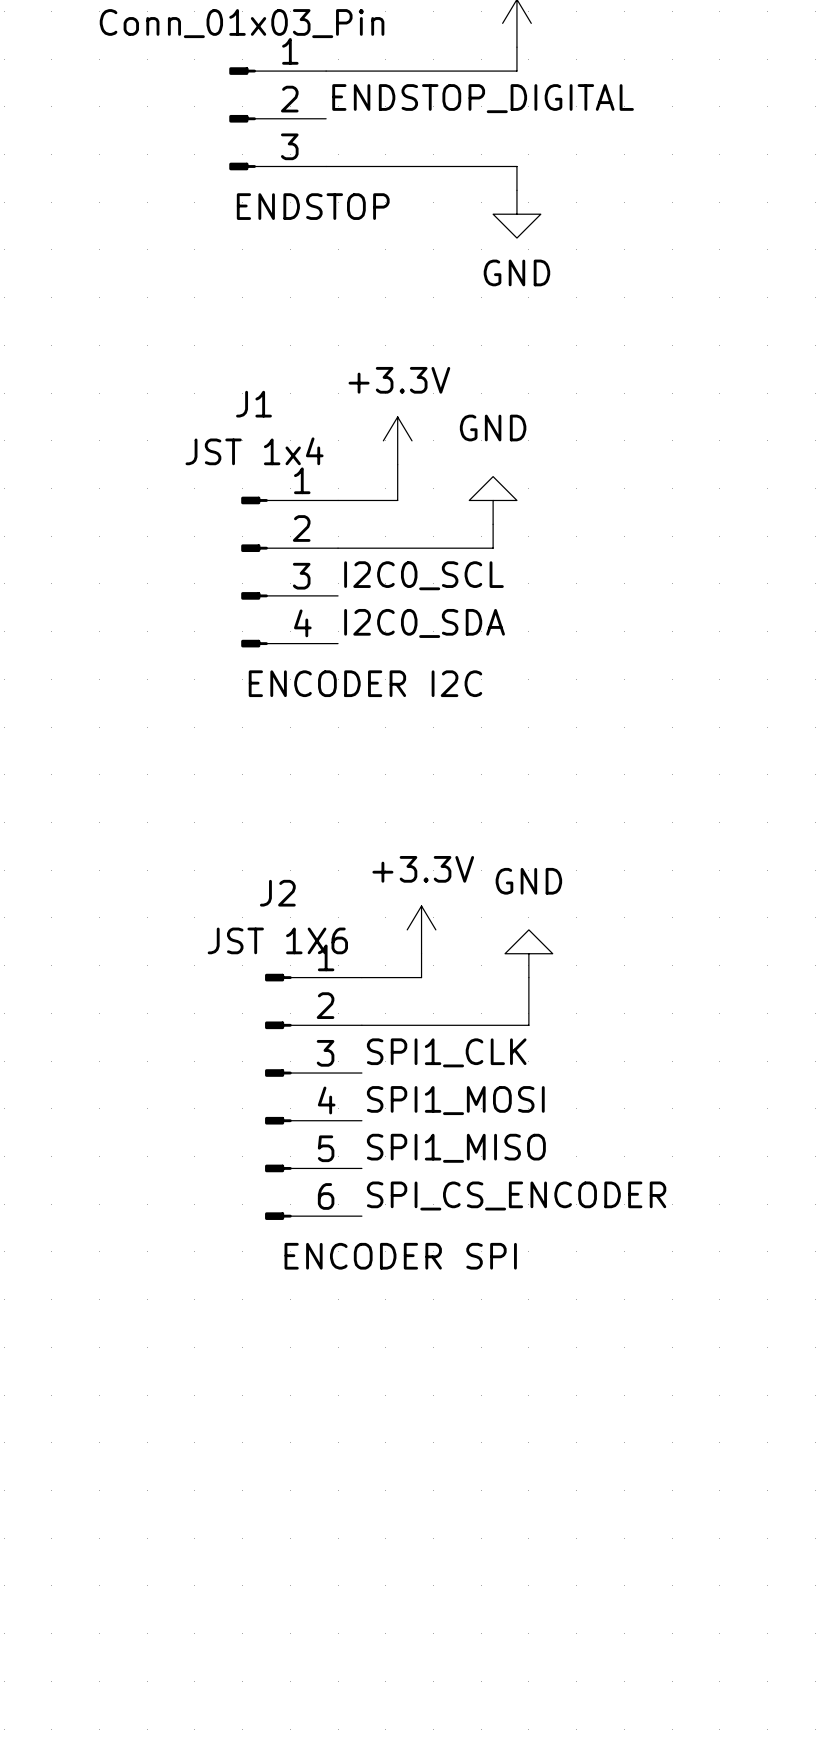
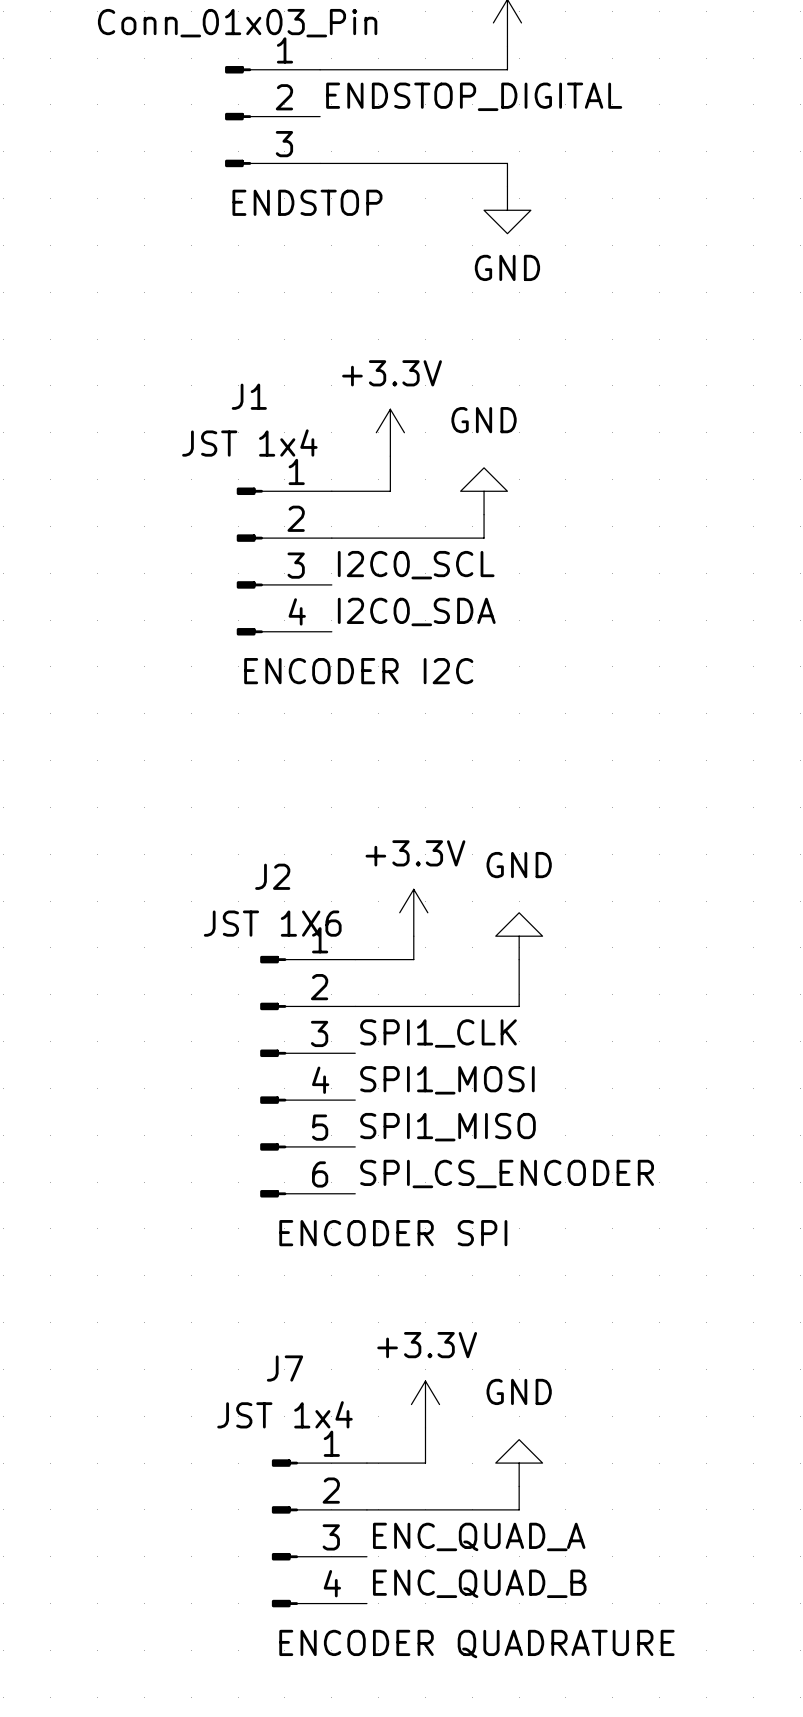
power symbol: none -> +3.3V (425, 1404)
wire: none -> (425, 1427) (425, 1463) (366, 1463)
power symbol: none -> GND (519, 1463)
wire: none -> (519, 1486) (519, 1509) (366, 1509)
J7: none -> JST 1x4 (319, 1533)
label: none -> ENC_QUAD_A (479, 1536)
label: none -> ENC_QUAD_B (479, 1583)
text: none -> ENCODER QUADRATURE (476, 1644)

